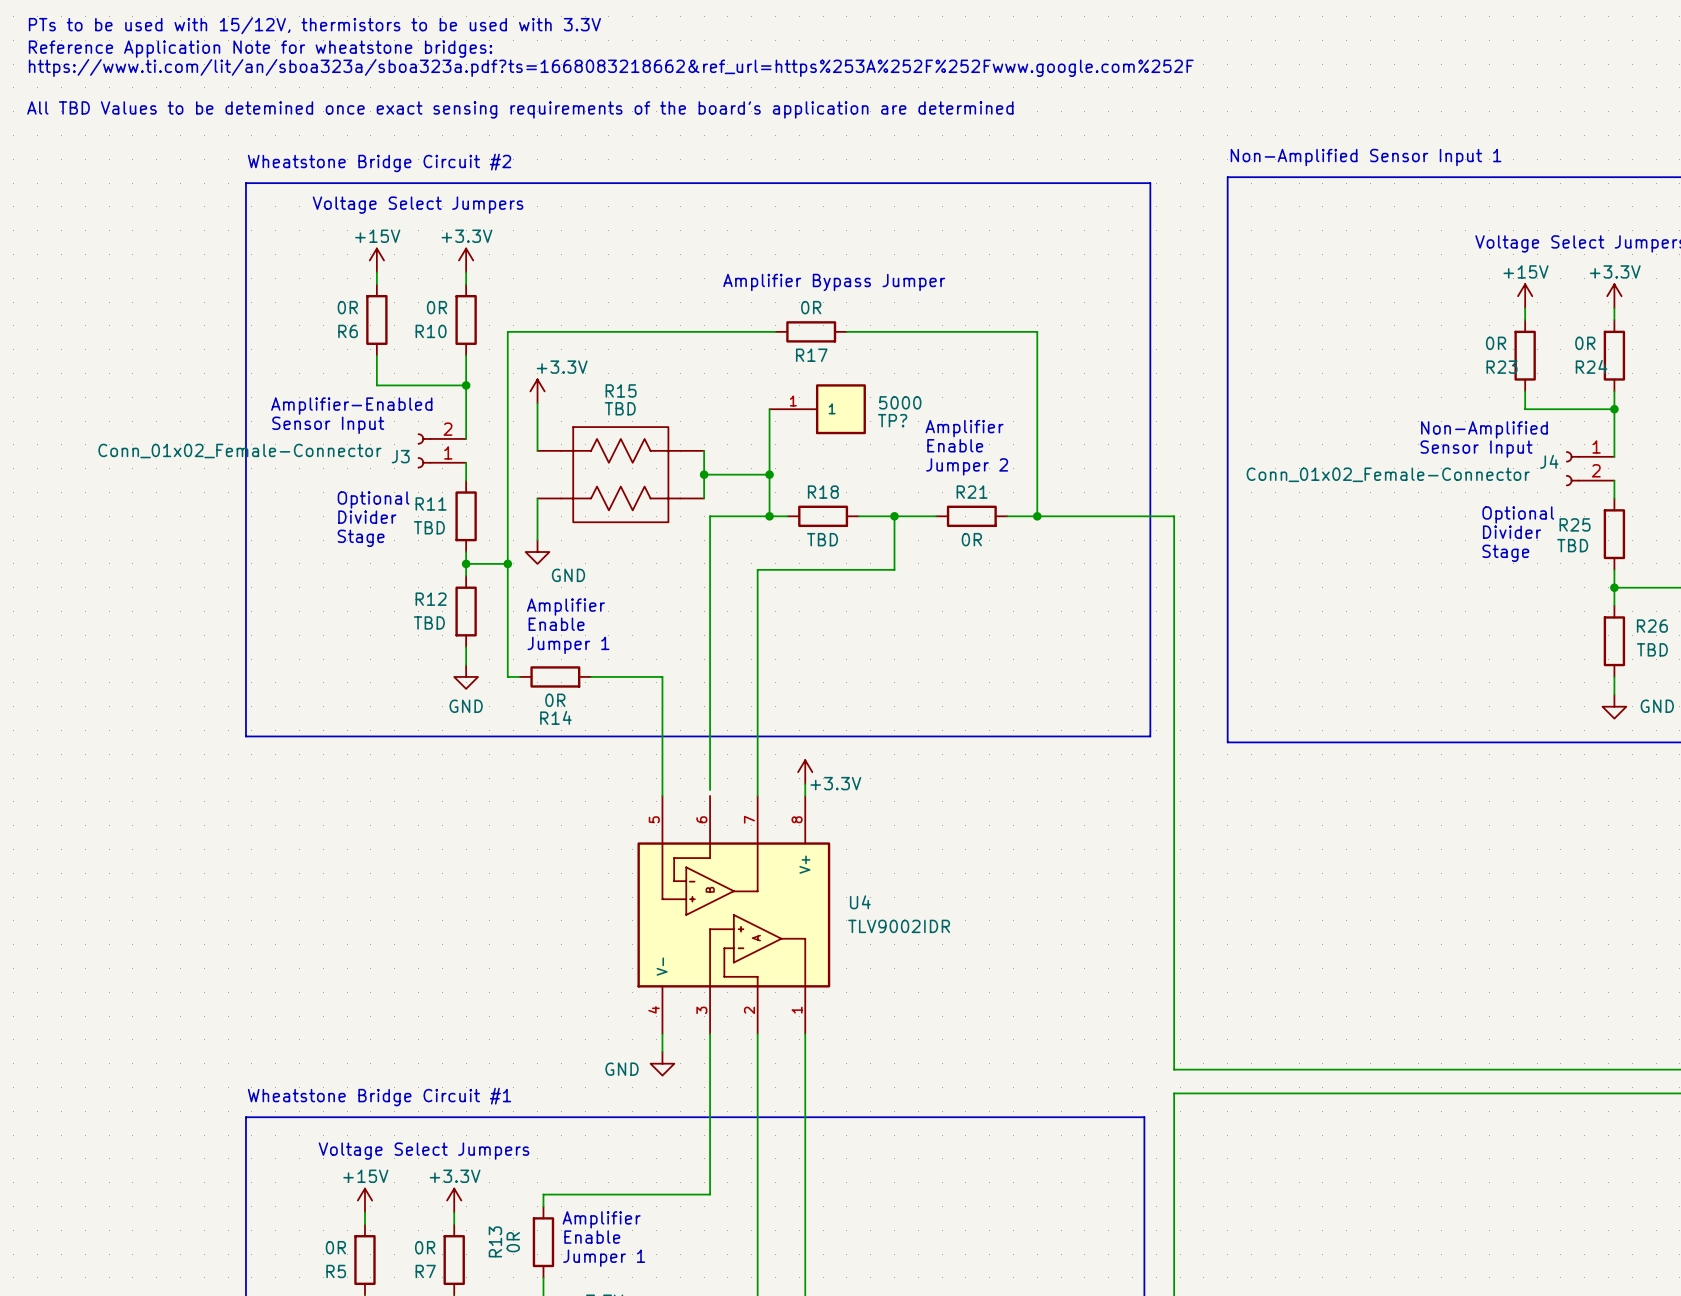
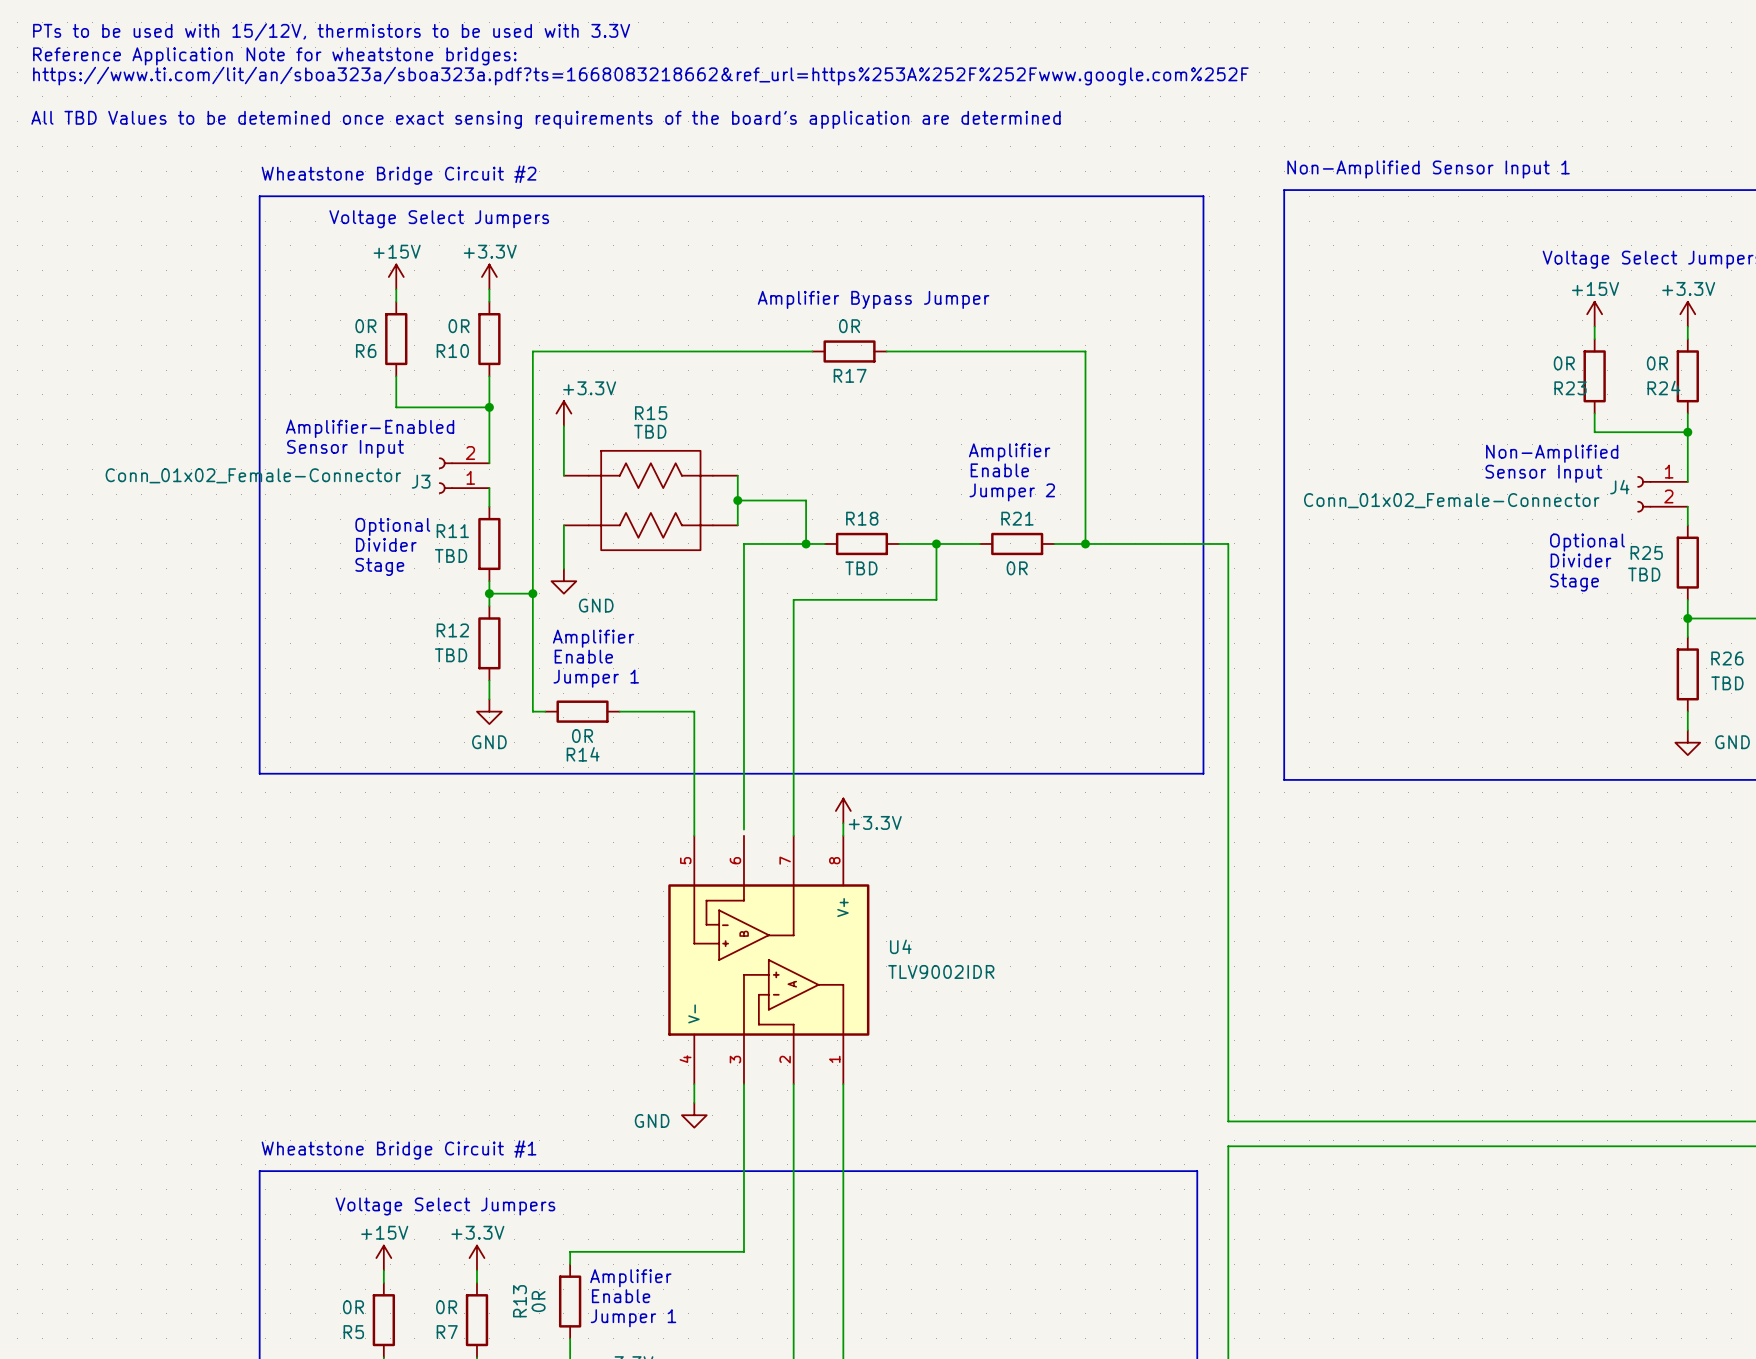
wire: (769, 409) (769, 474) -> none
TP?: 5000 (817, 409) -> none
junction: (769, 474) -> none

